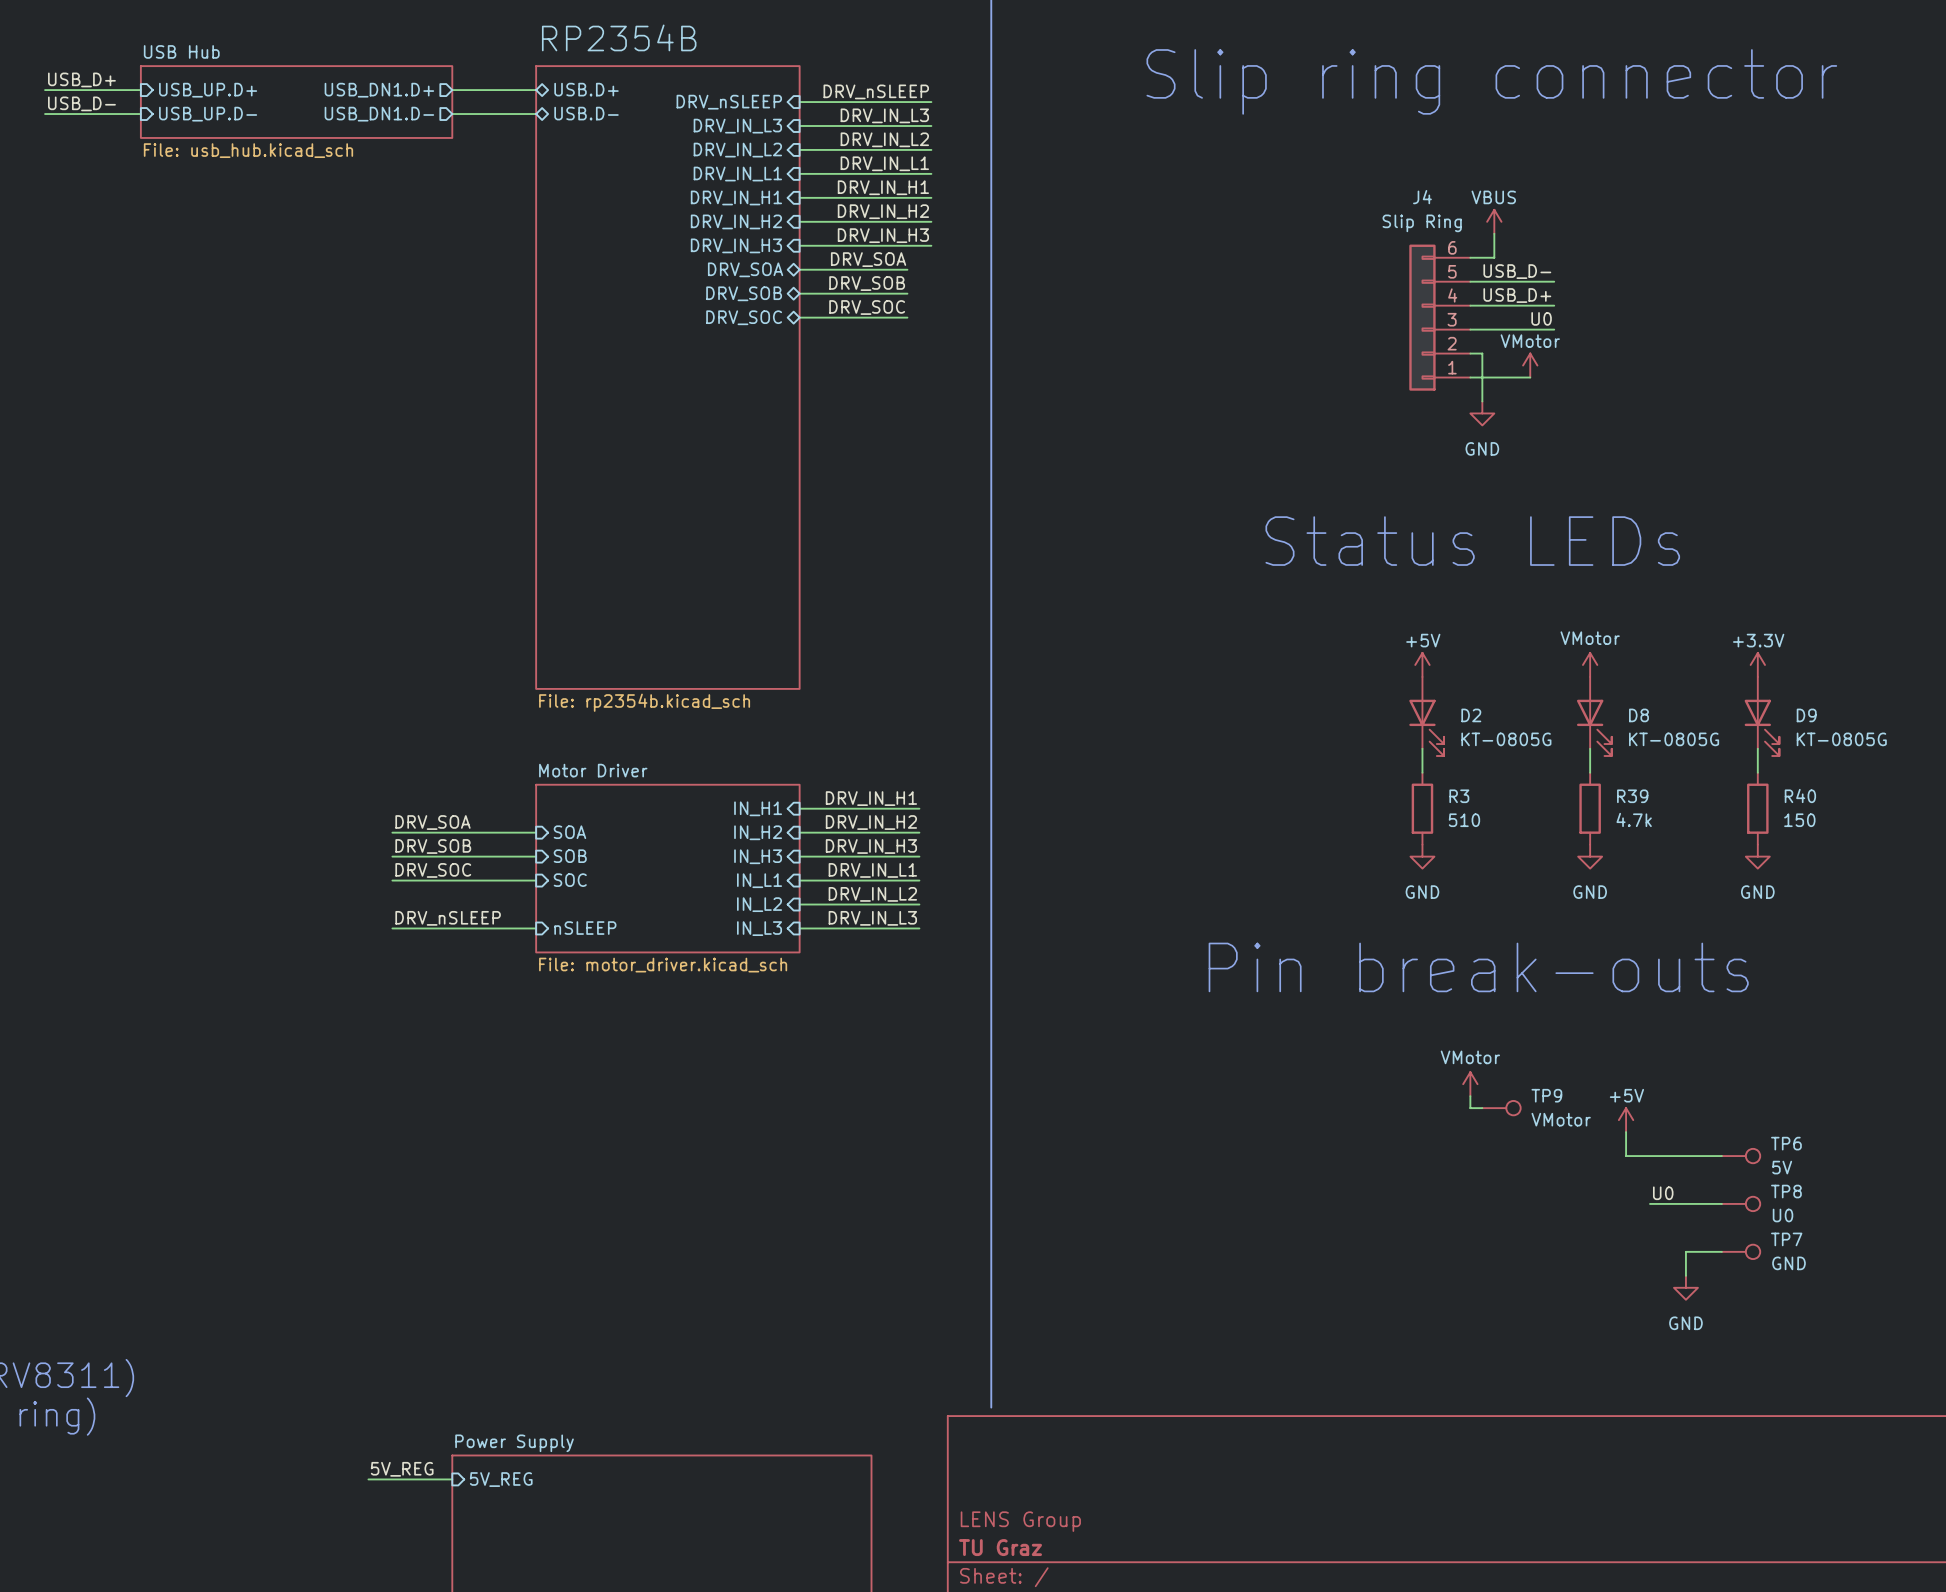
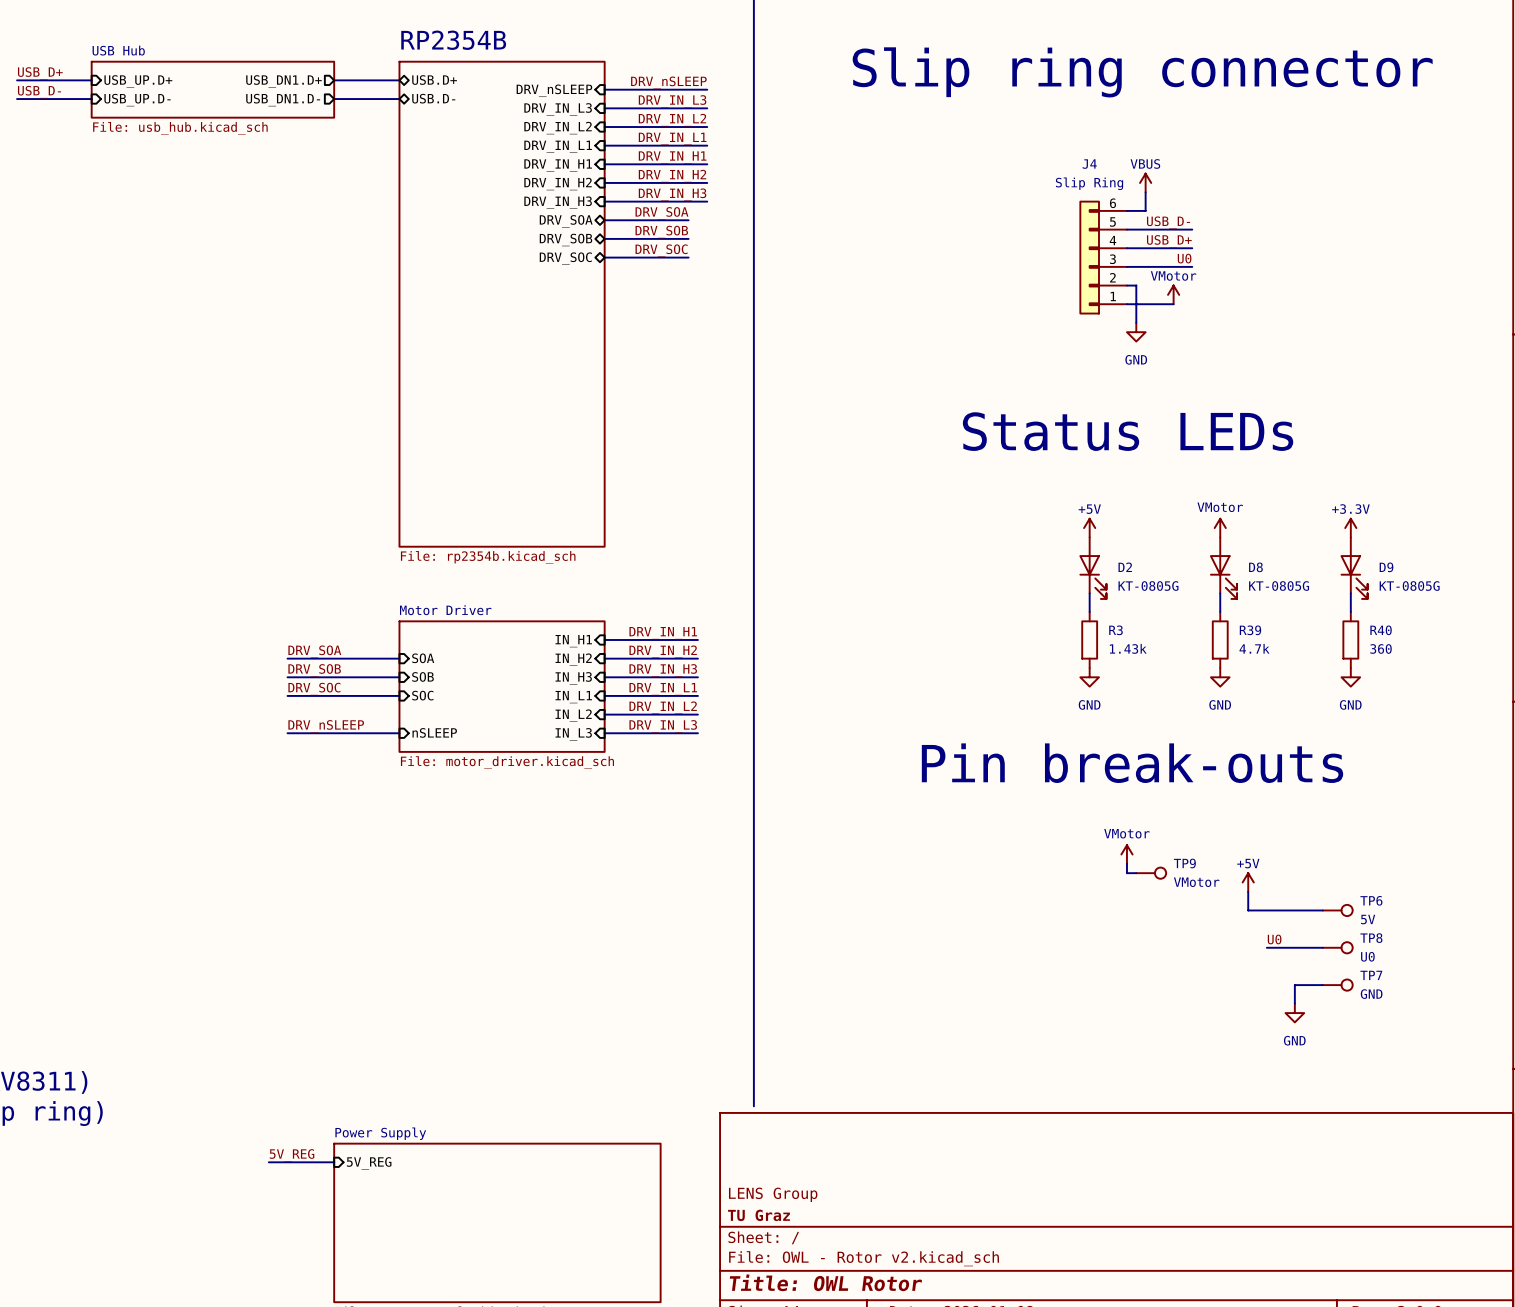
R3 value: 510 (1464, 820) -> 1.43k (1128, 648)
R40 value: 150 (1799, 820) -> 360 (1381, 648)

